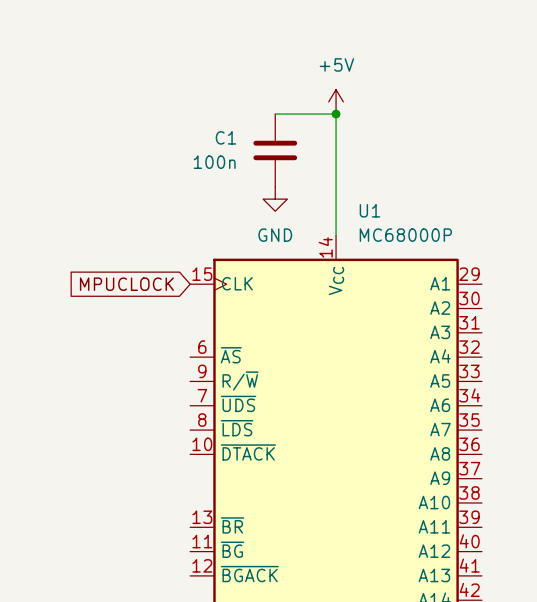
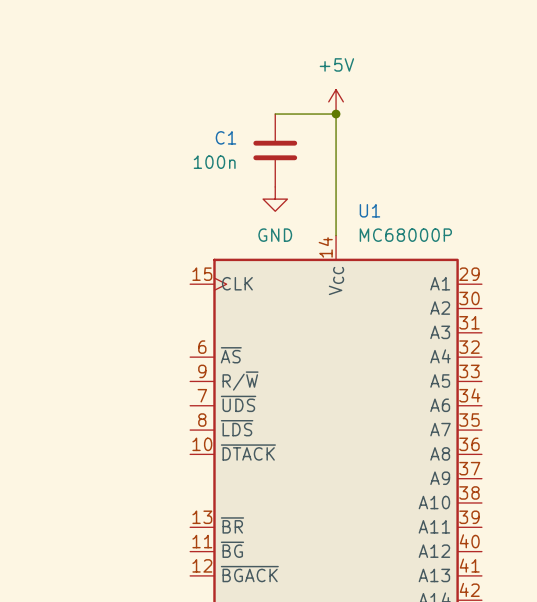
global label: MPUCLOCK (126, 284) -> none

